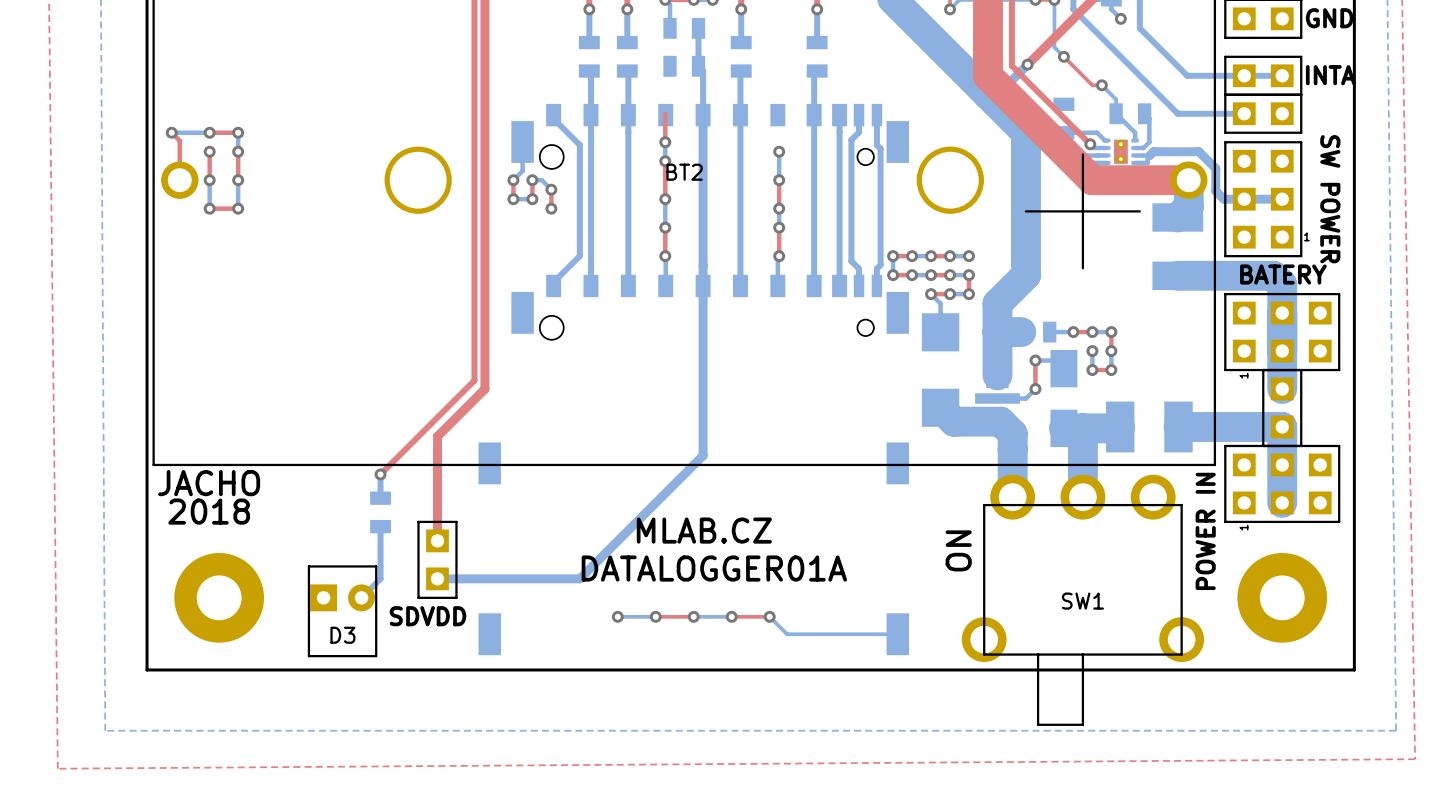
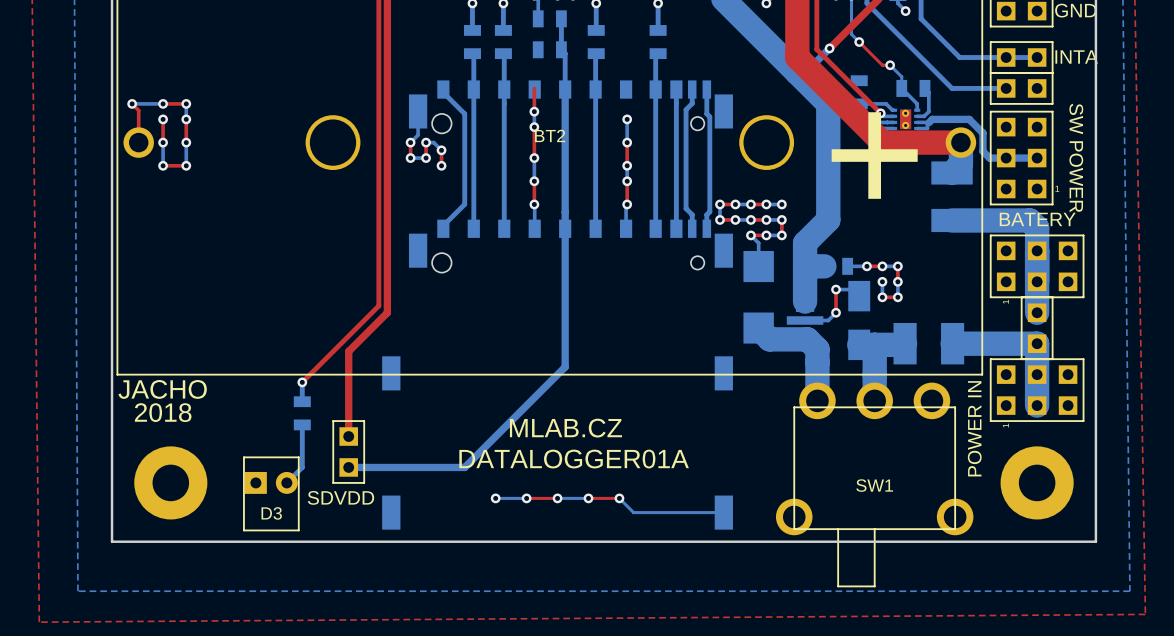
text: ON (958, 550) -> none

